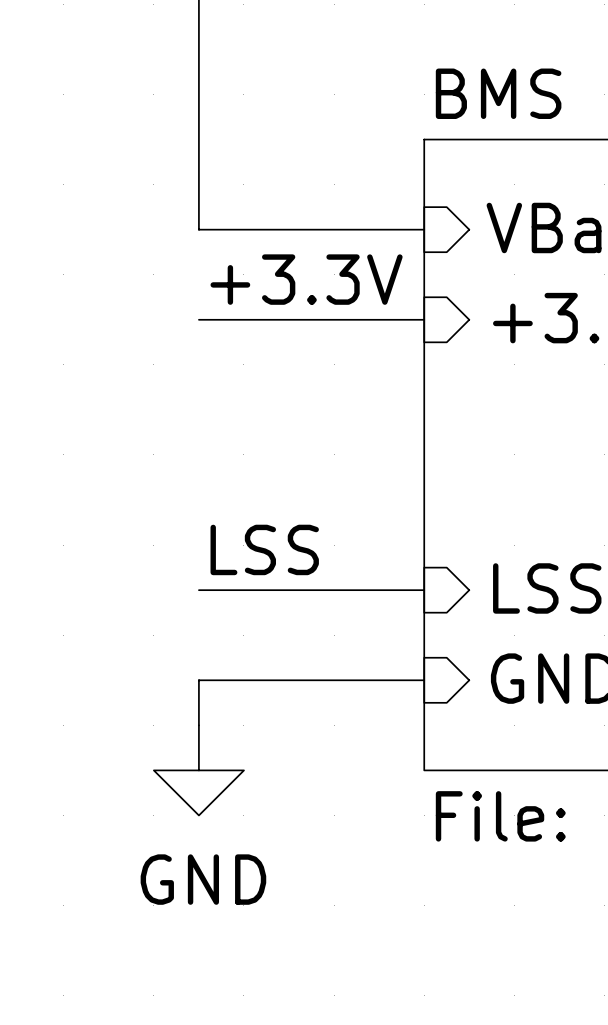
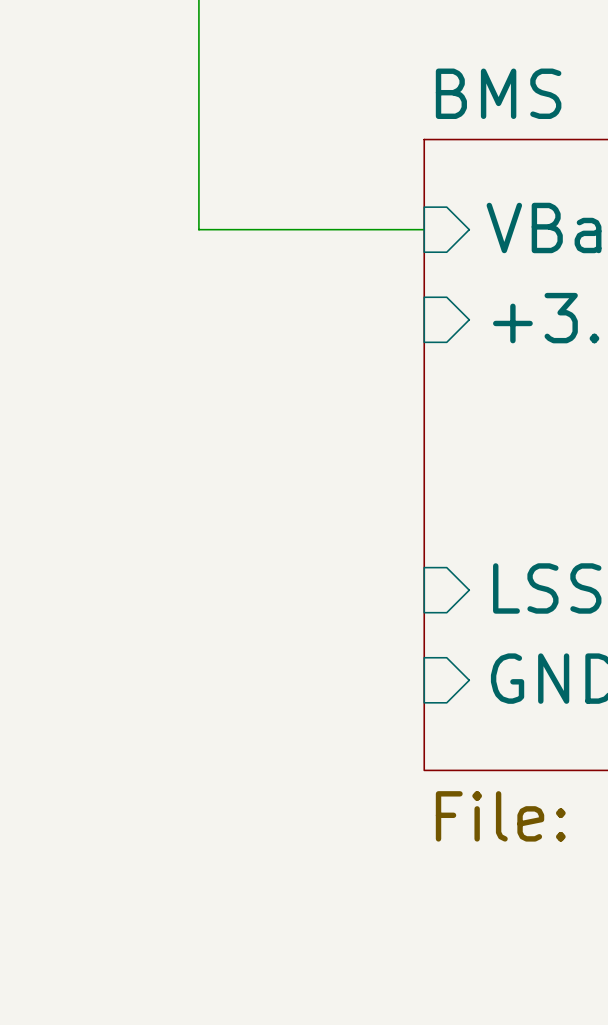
label: +3.3V (306, 279) -> none
wire: (198, 319) (424, 319) -> none
label: LSS (264, 549) -> none
wire: (198, 590) (424, 590) -> none
wire: (424, 680) (198, 680) (198, 725) -> none
power symbol: GND (198, 770) -> none

